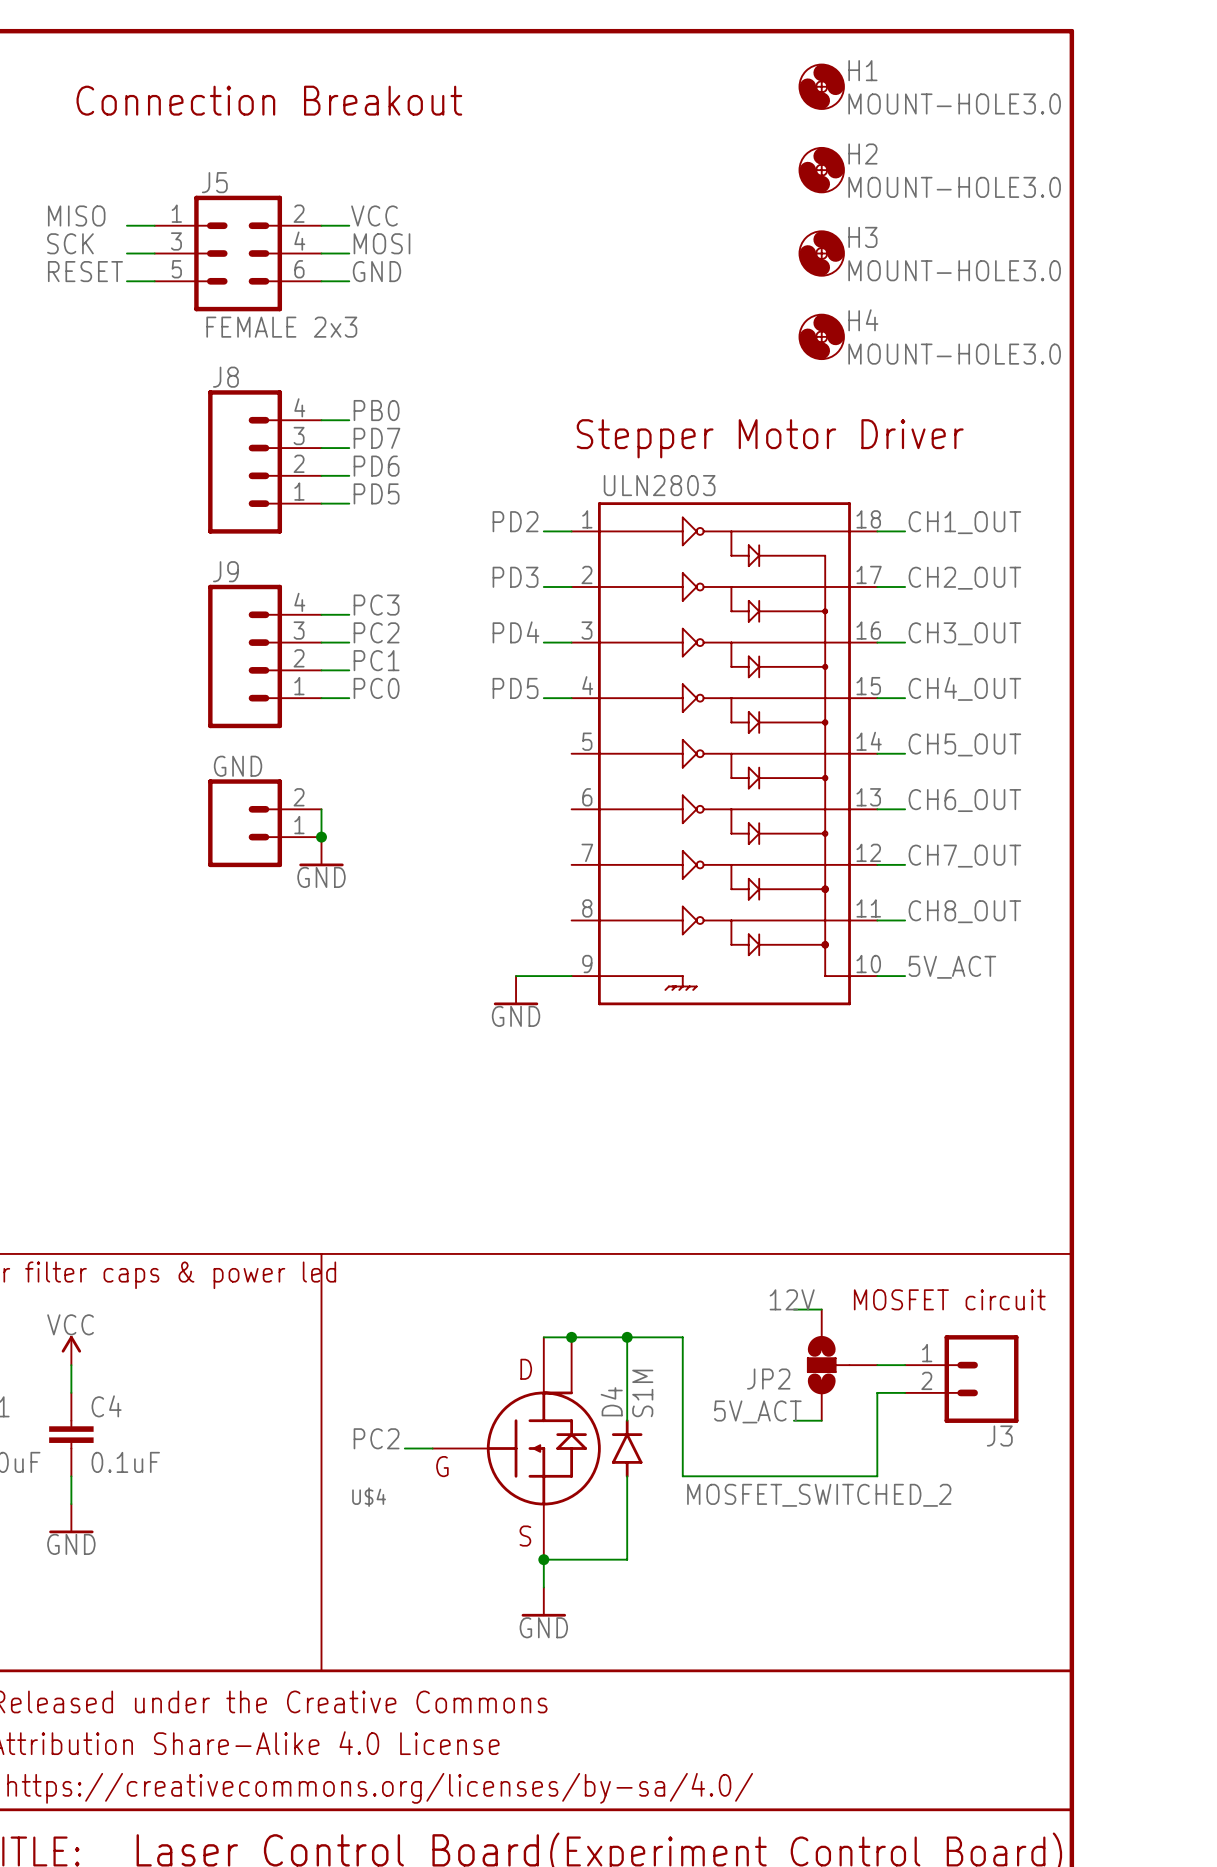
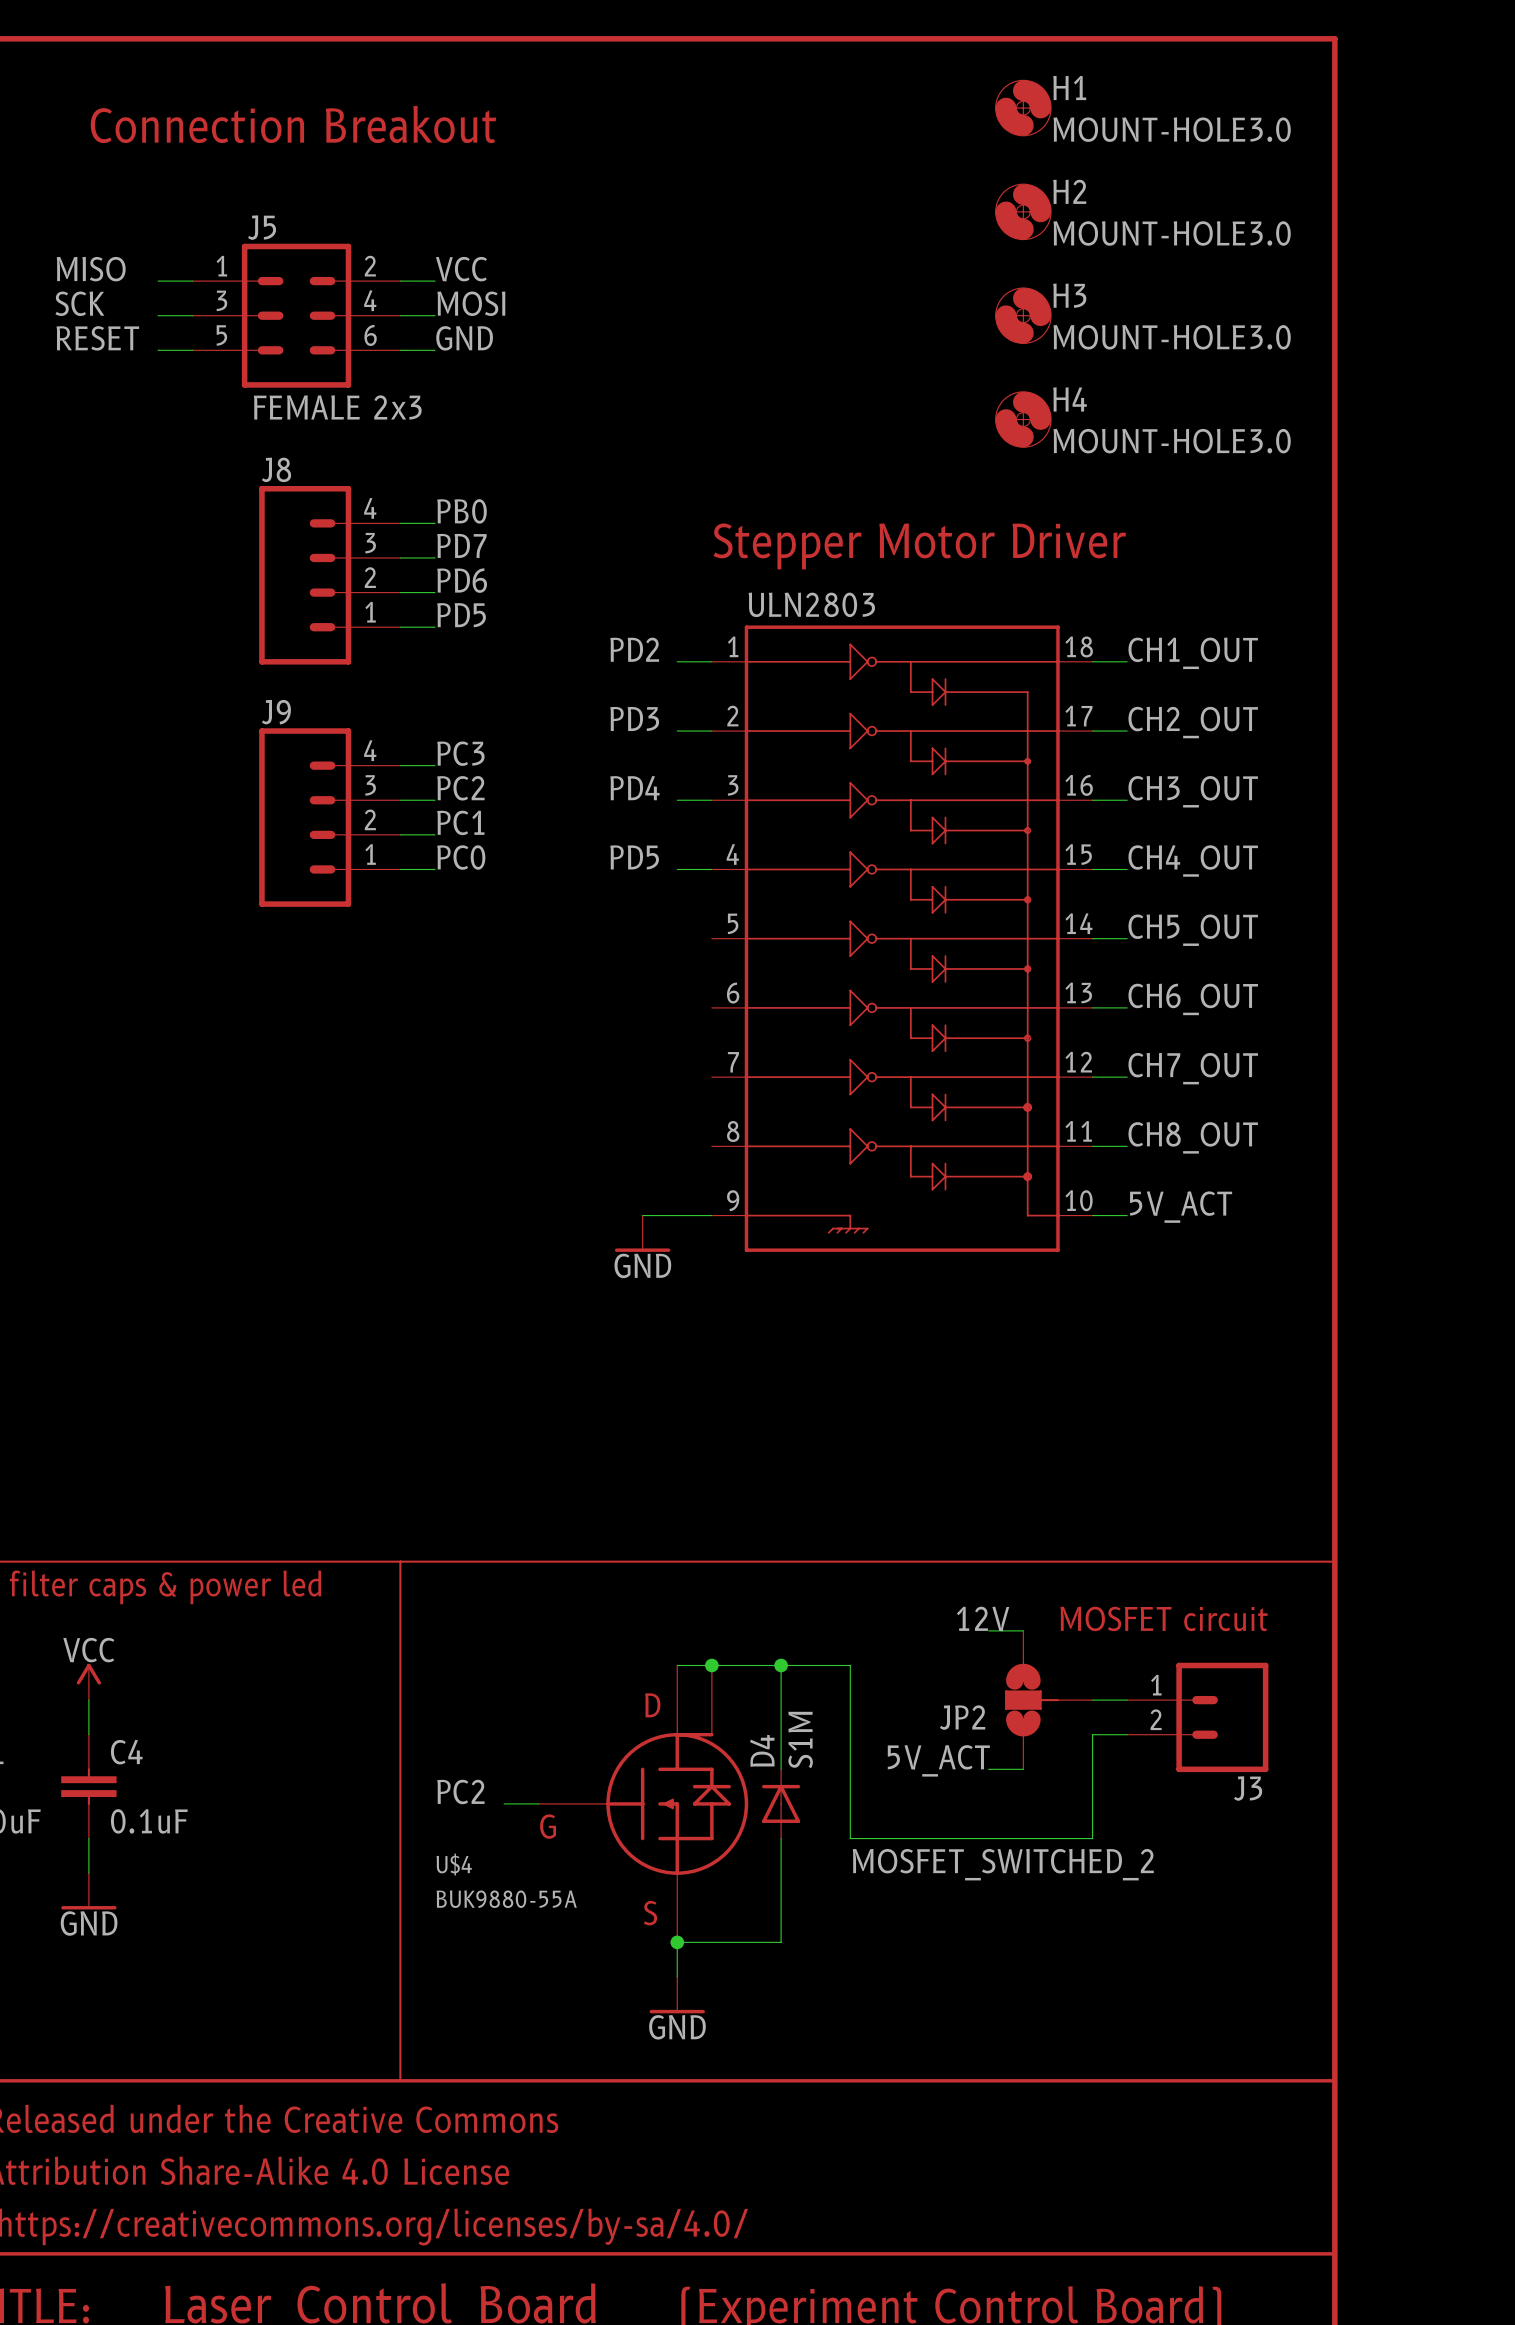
wire: (321, 809) (321, 837) -> none
GND: (264, 823) -> none
junction: (321, 837) -> none
power symbol: GND (321, 851) -> none
D4 symbol: [611, 1419, 643, 1478] -> [762, 1769, 801, 1839]
U$4 value: none -> BUK9880-55A (506, 1899)

